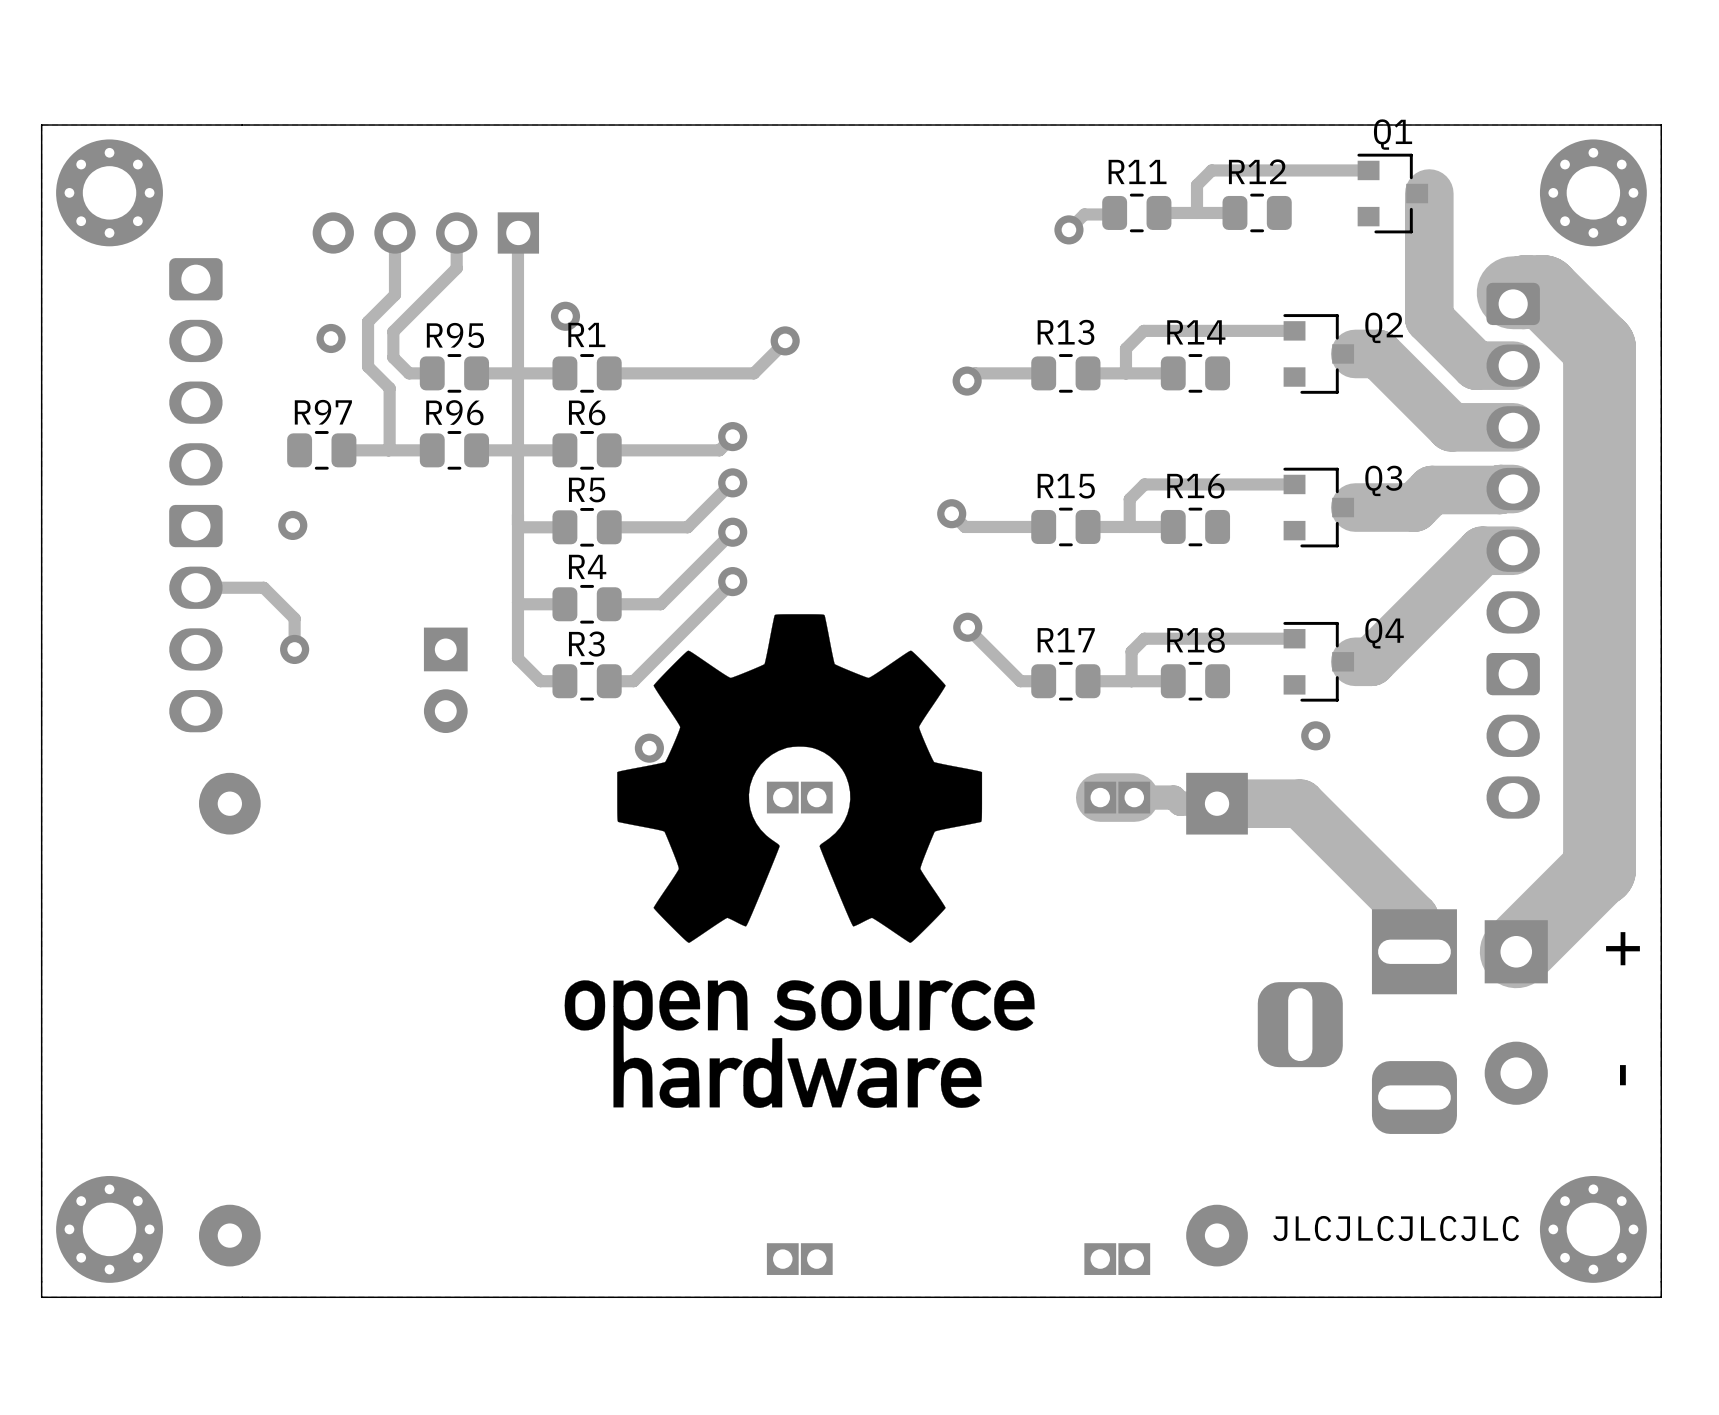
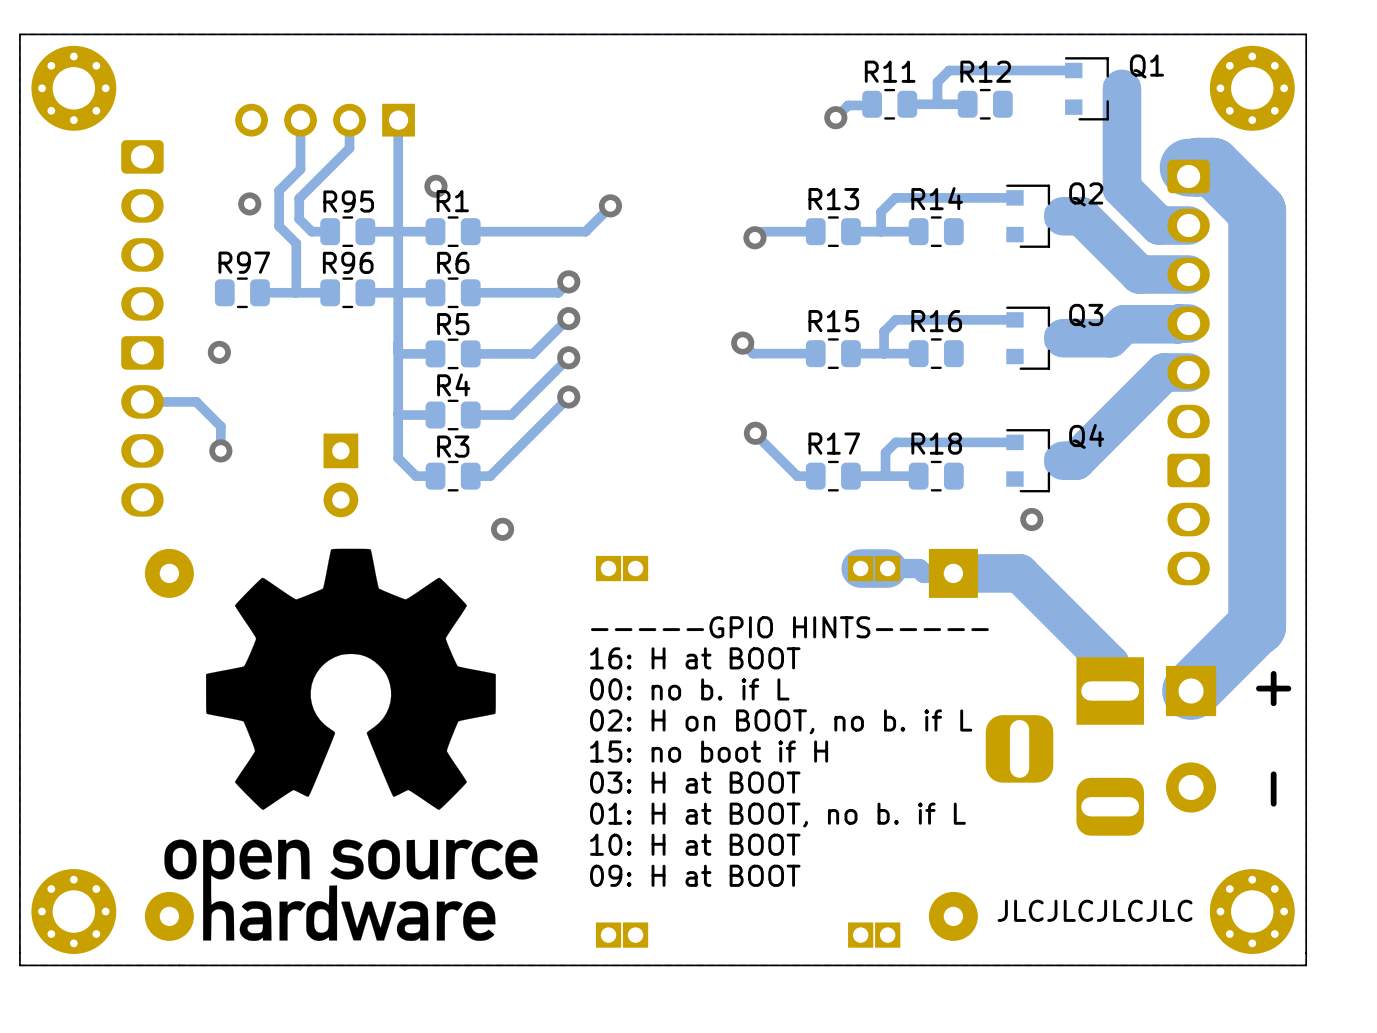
Q1 name position: Q1 (1393, 134) -> Q1 (1146, 66)
drawing position: (799, 861) -> (350, 744)
text: none -> -----GPIO HINTS----- (789, 627)
text: none -> 16: H at BOOT (695, 658)
text: none -> 00: no b. if L (689, 689)
text: none -> 02: H on BOOT, no b. if L (781, 721)
text: none -> 15: no boot if H (709, 751)
text: none -> 03: H at BOOT (695, 782)
text: none -> 01: H at BOOT, no b. if L (777, 815)
text: none -> 10: H at BOOT (695, 844)
text: none -> 09: H at BOOT (695, 875)

